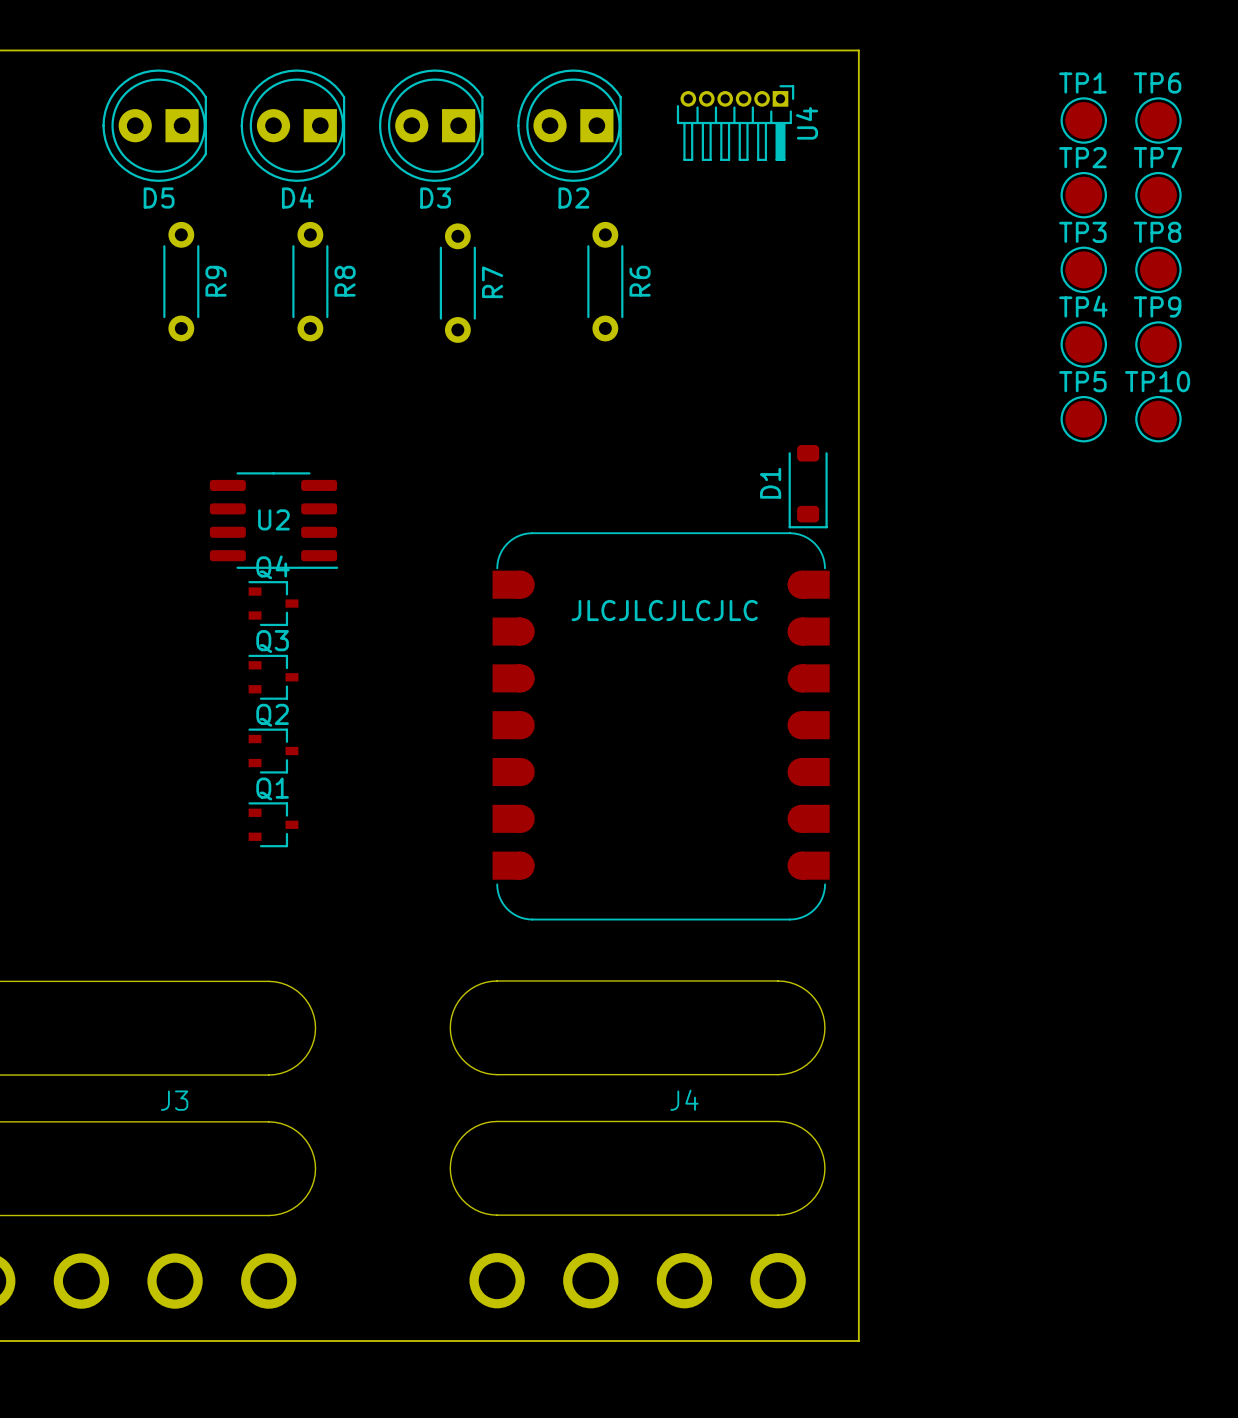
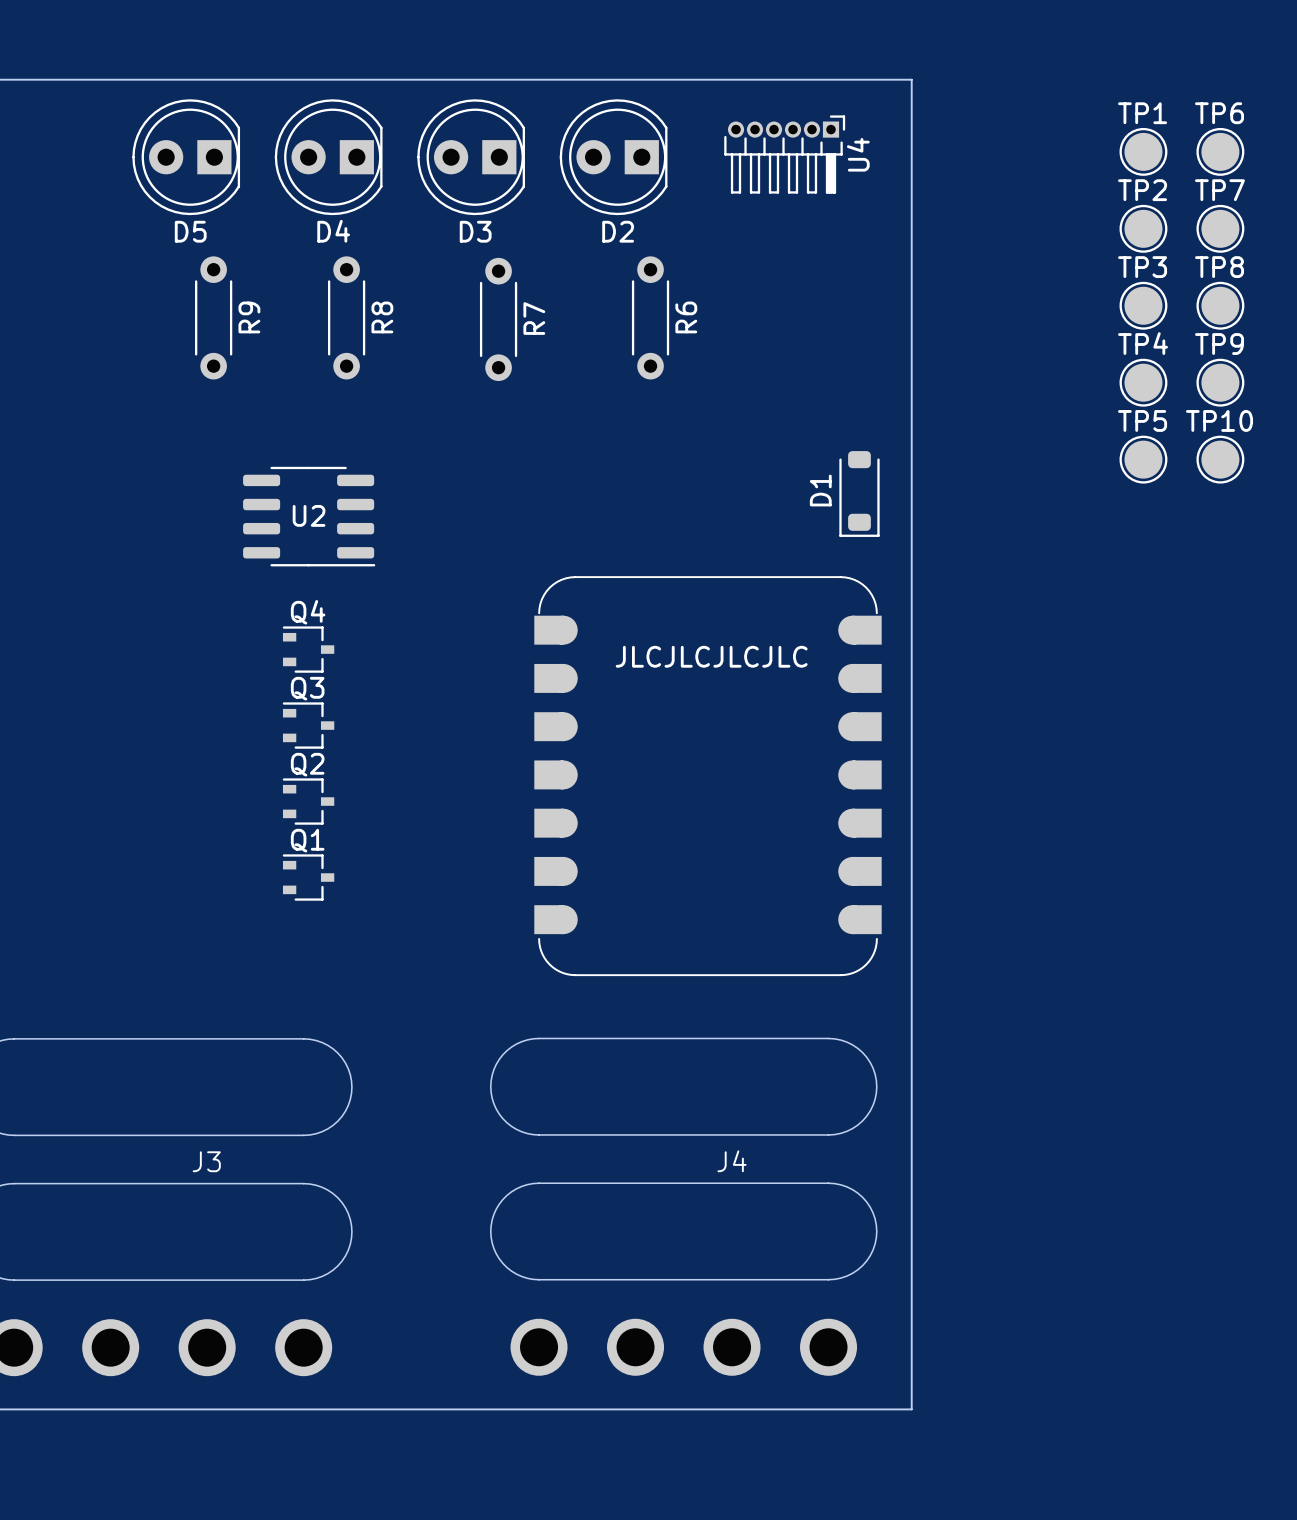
D1 position: (808, 486) -> (859, 494)
U2 position: (274, 520) -> (309, 516)

